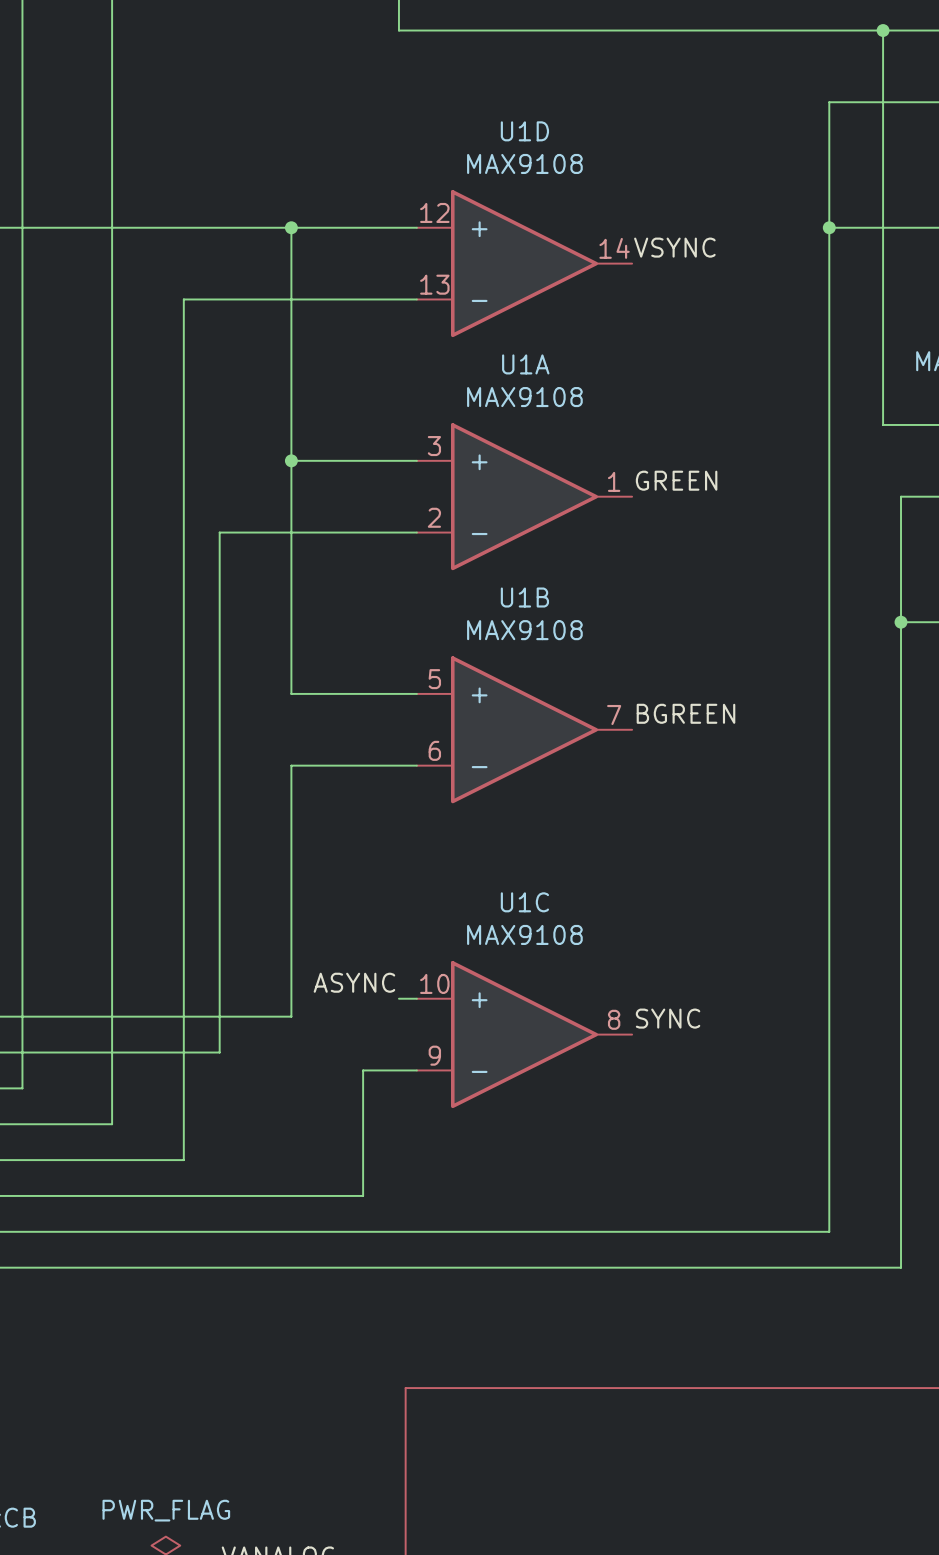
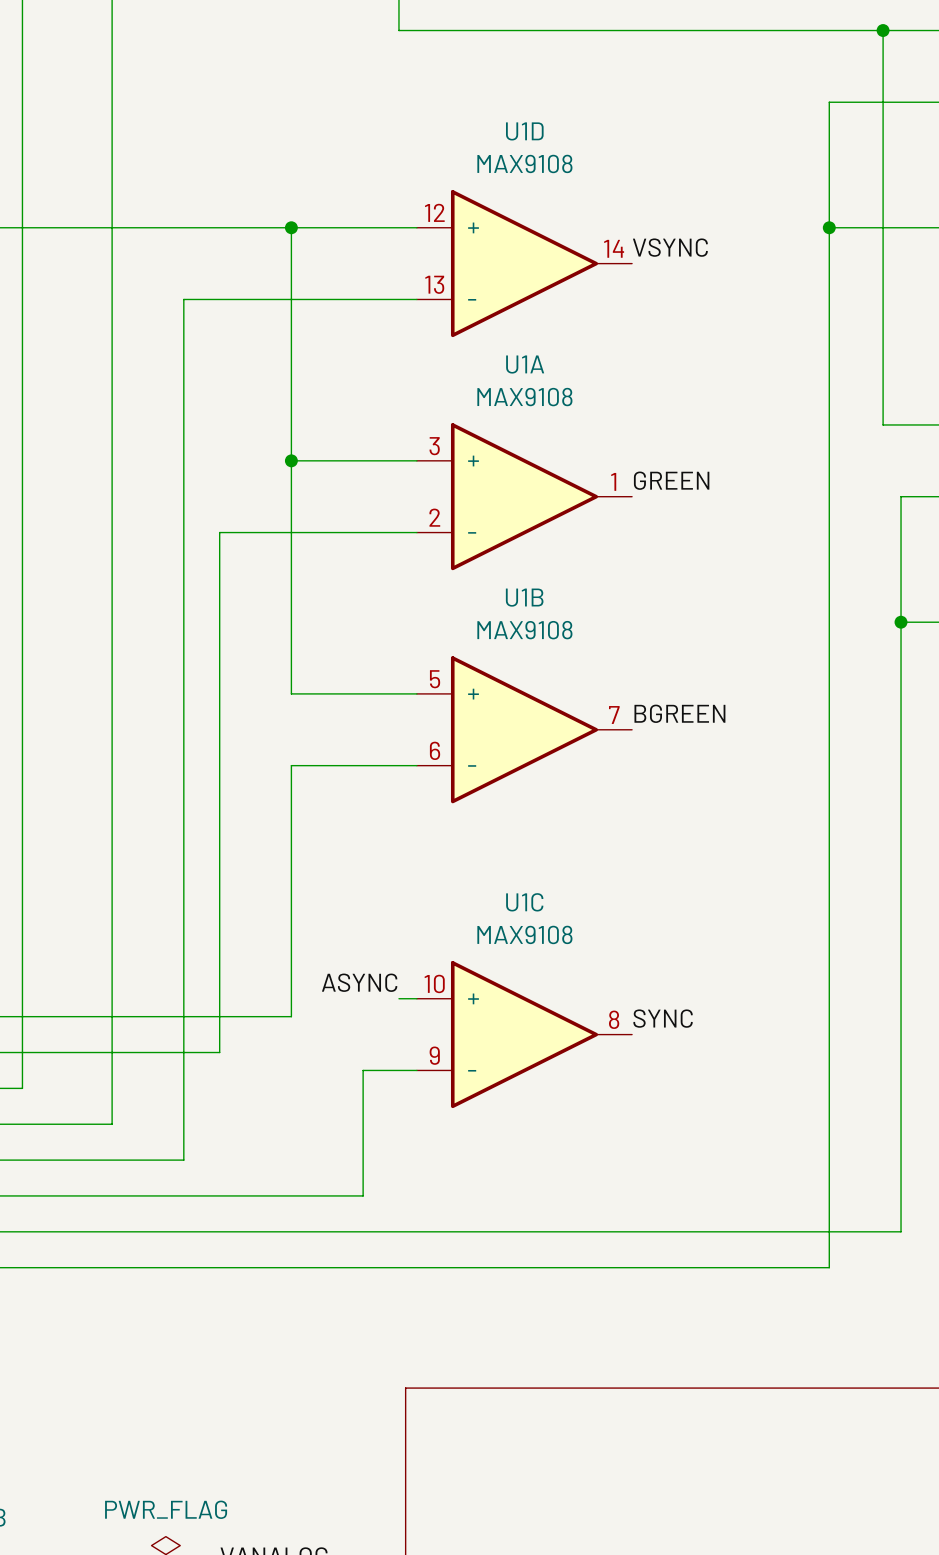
wire: (901, 1231) (901, 1267) (829, 1267) -> (901, 1231) (829, 1231) (829, 1267)

